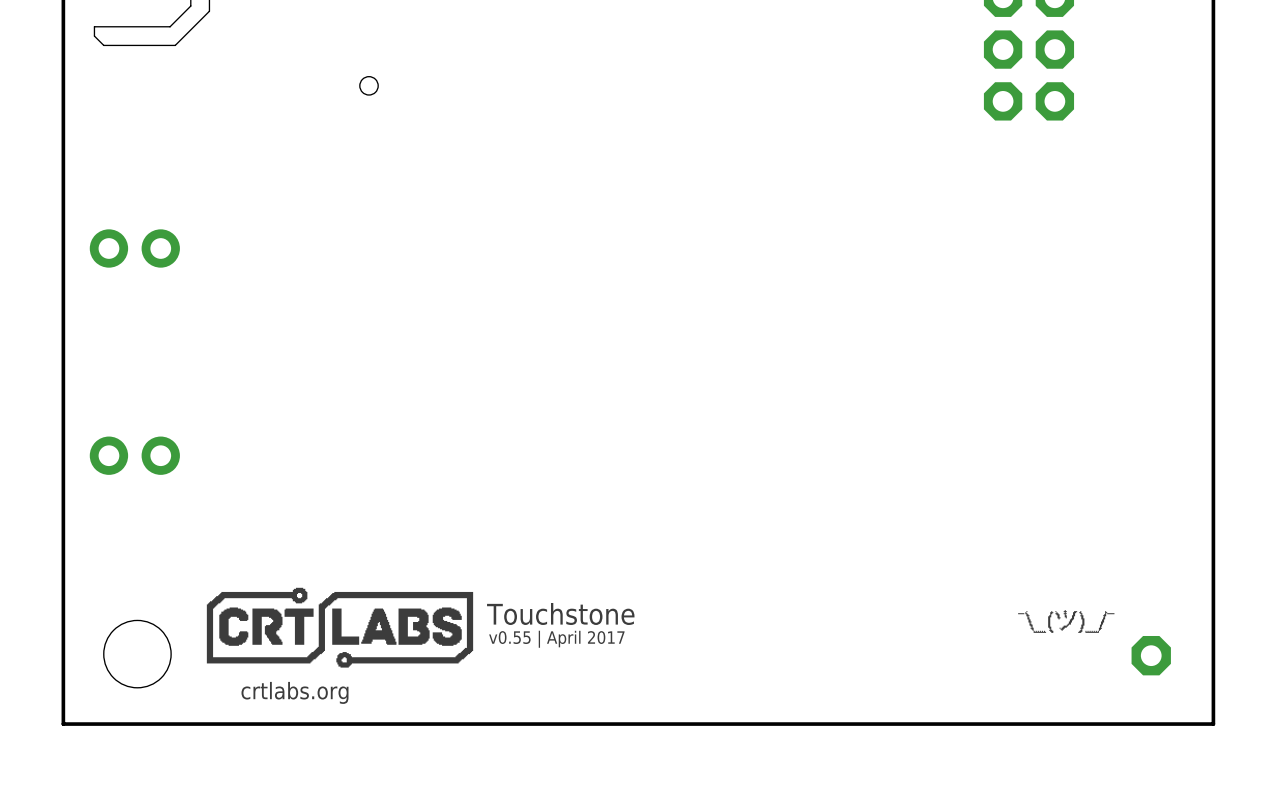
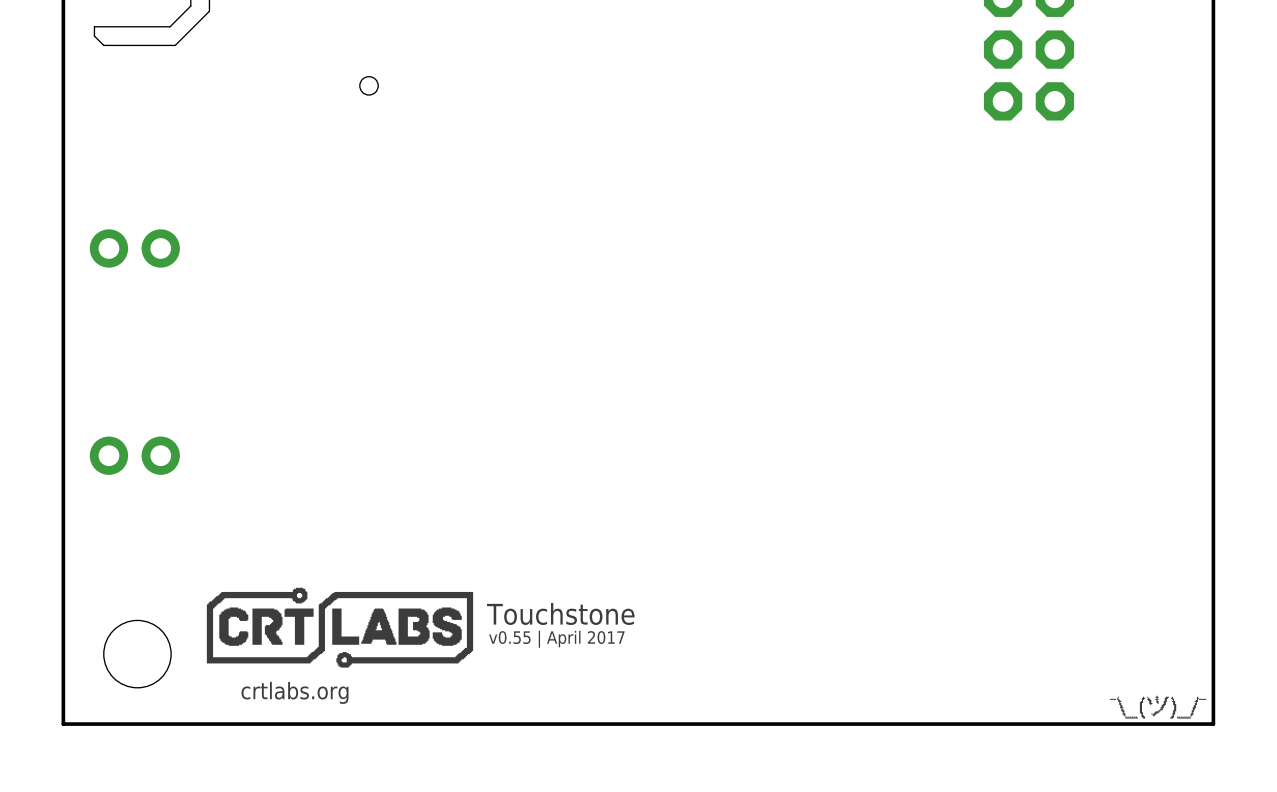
drawing: [1025, 610, 1108, 633] -> none
drawing position: (1021, 613) -> (1112, 699)
drawing position: (1110, 613) -> (1202, 699)
drawing position: (1039, 632) -> (1131, 718)
drawing position: (1092, 632) -> (1183, 718)
part: (1151, 655) -> none
drawing: none -> [1117, 695, 1199, 719]

